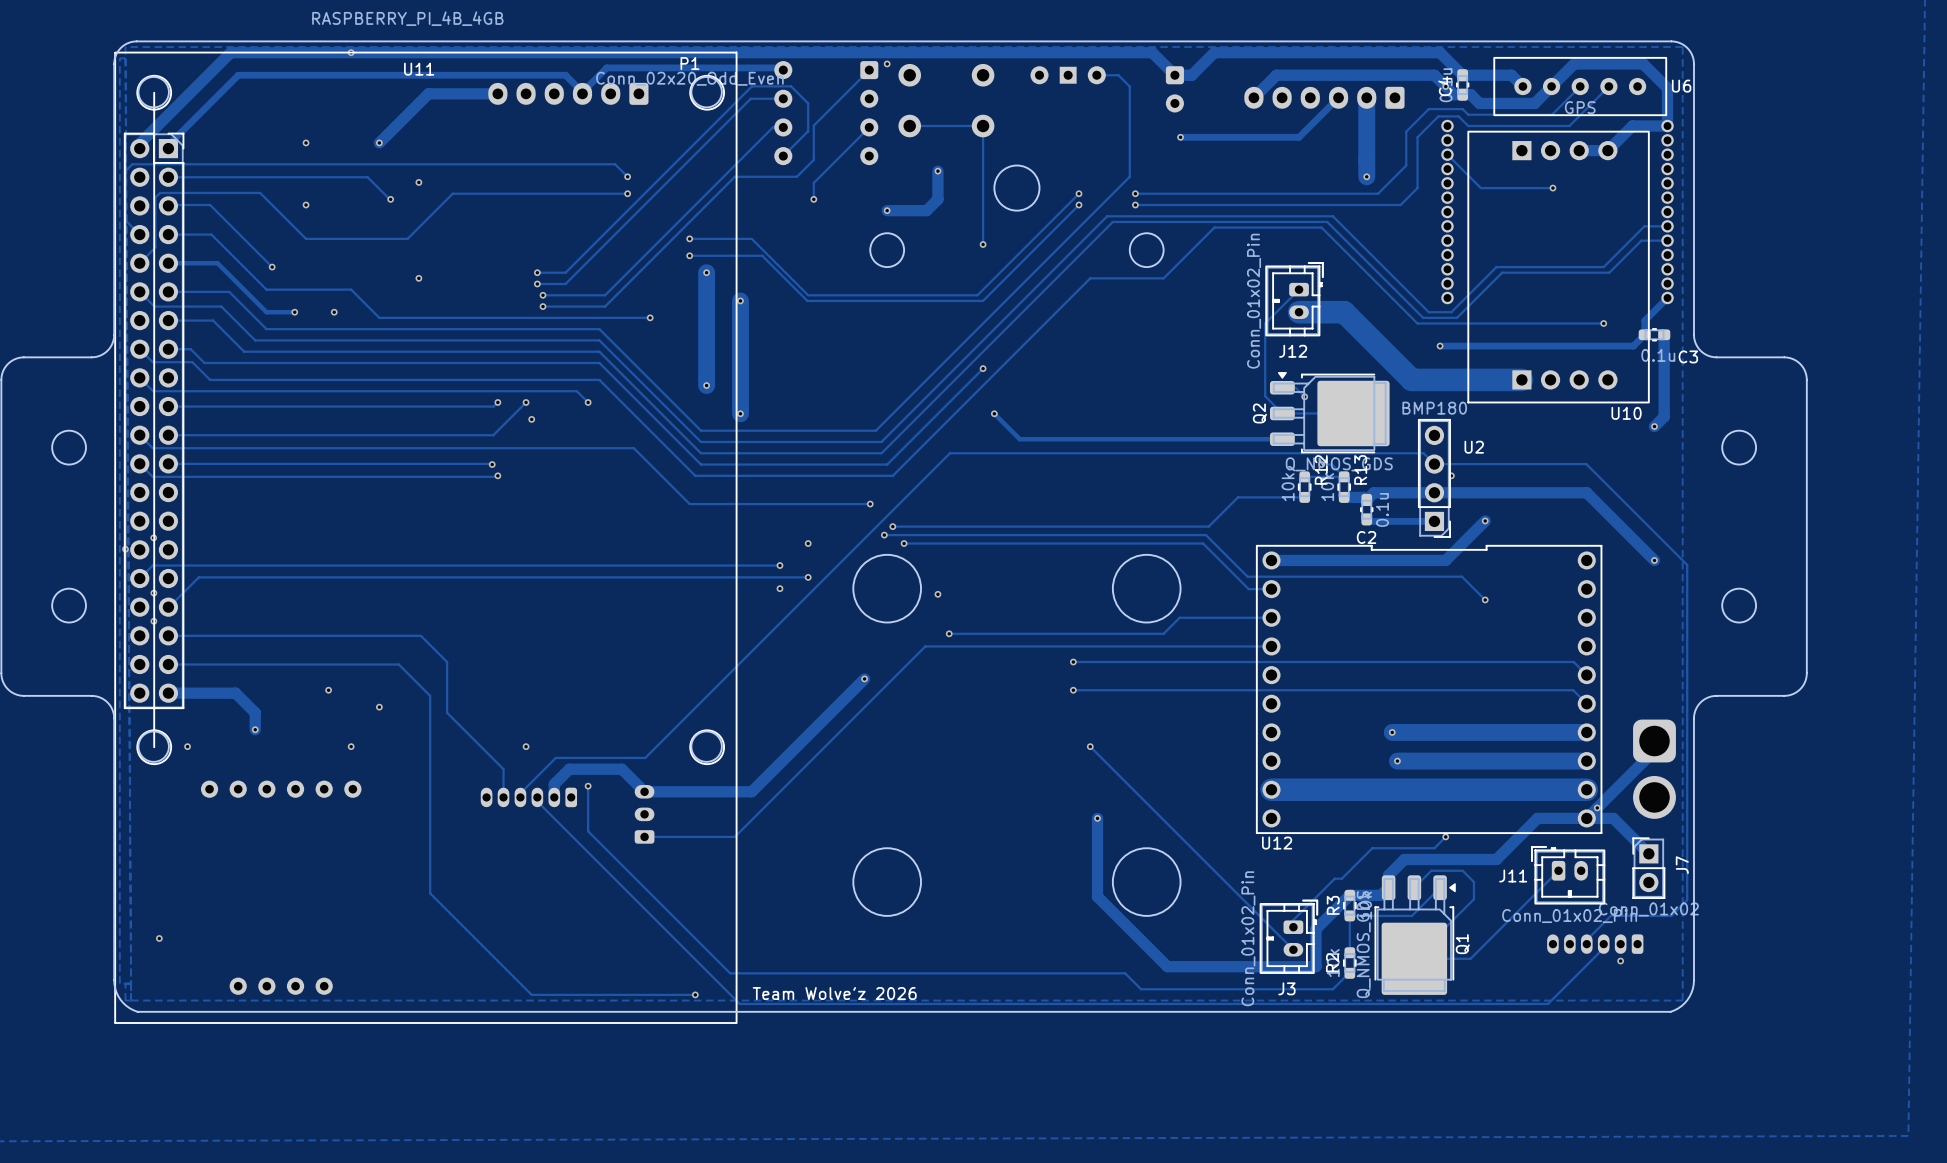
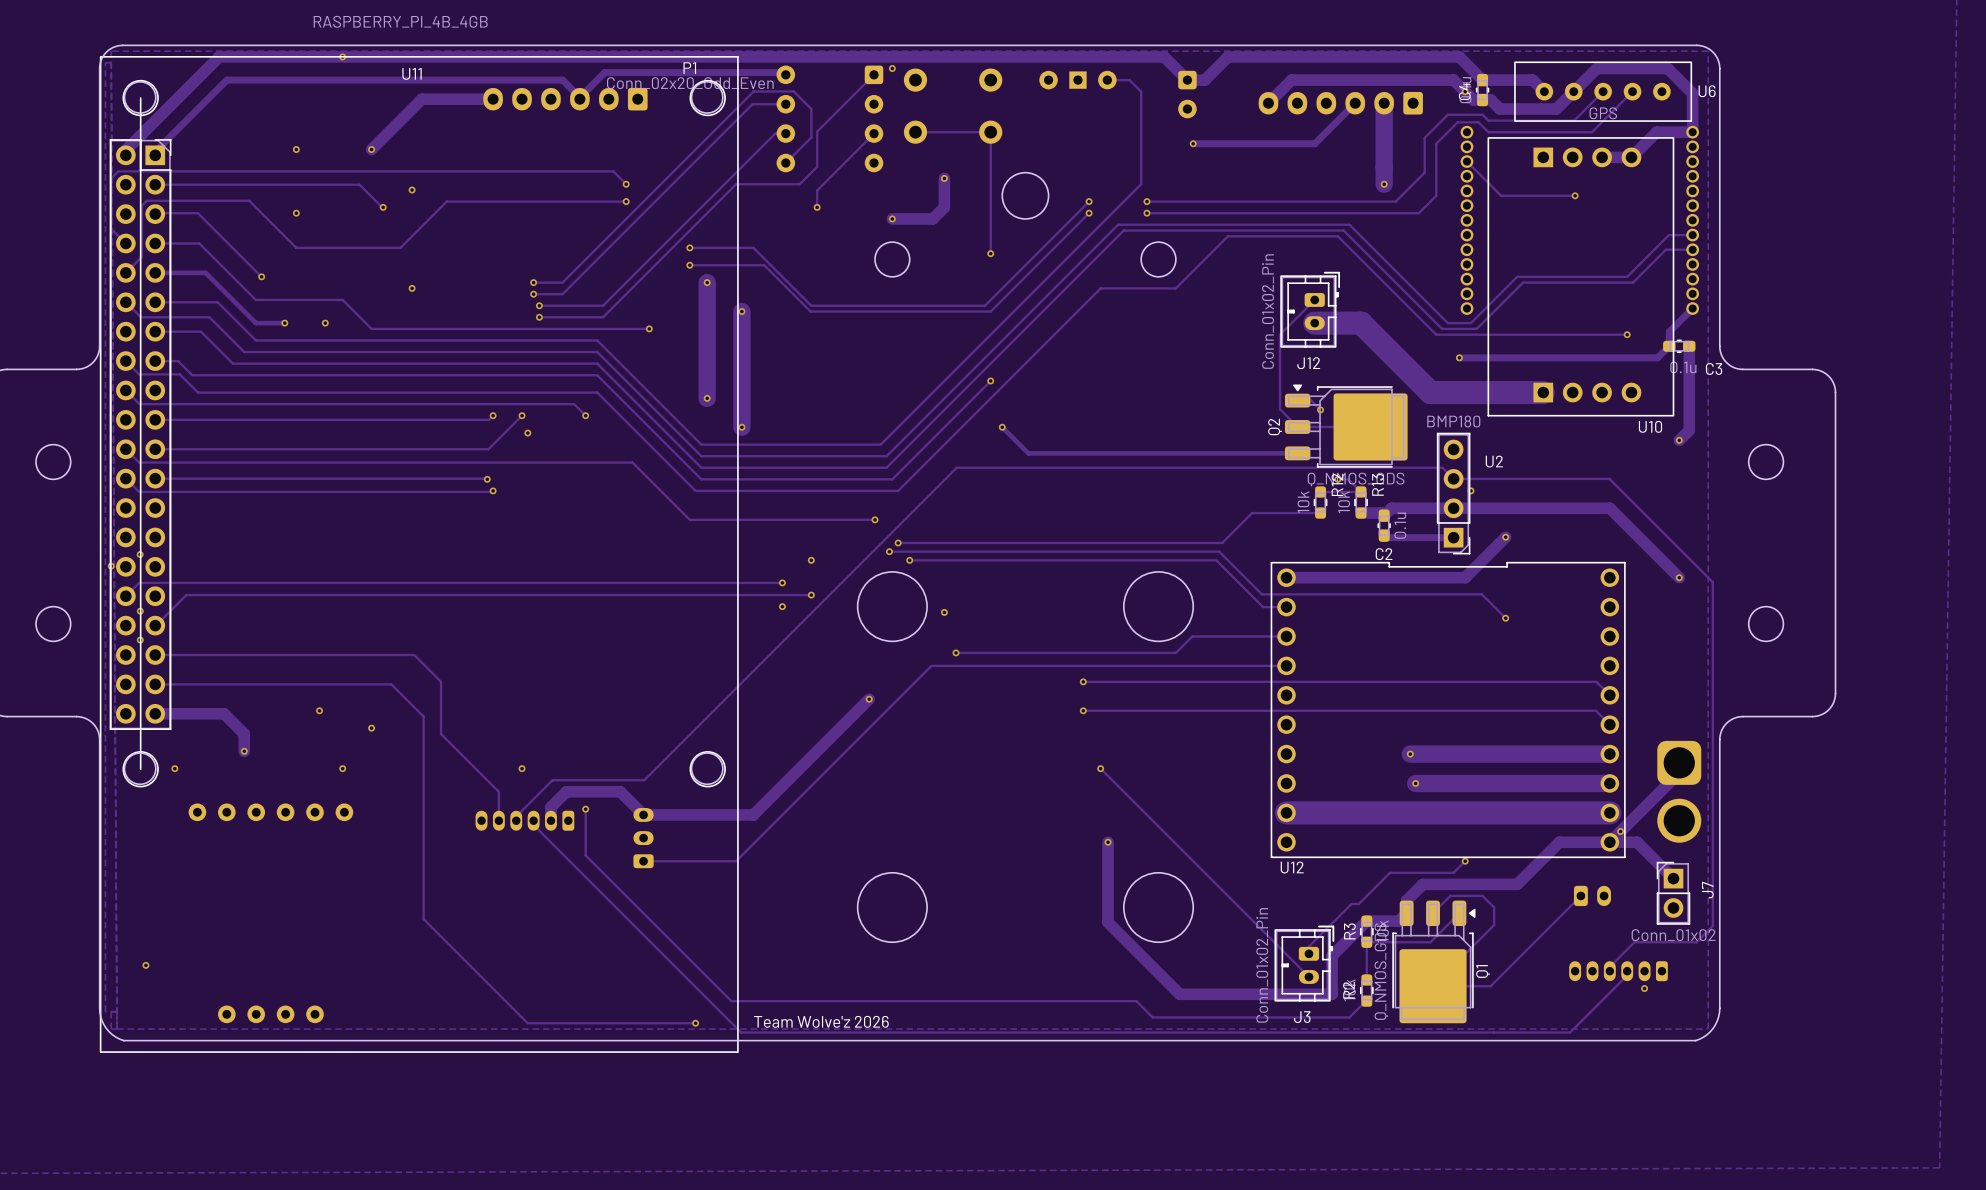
J11 side: top (1568, 875) -> bottom (1592, 895)

